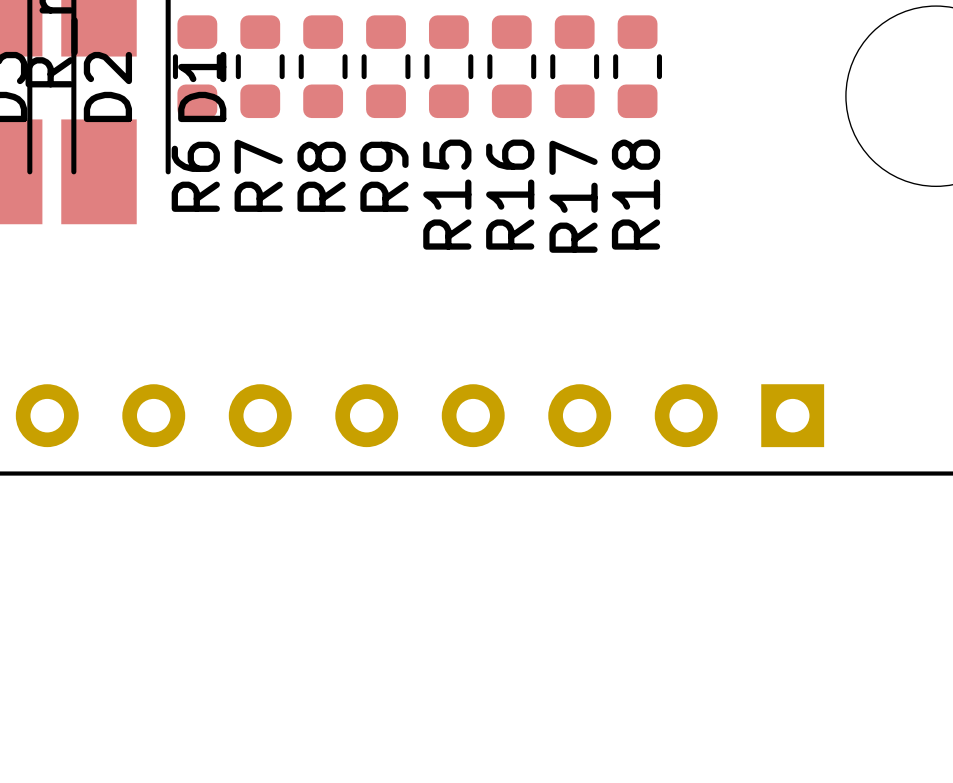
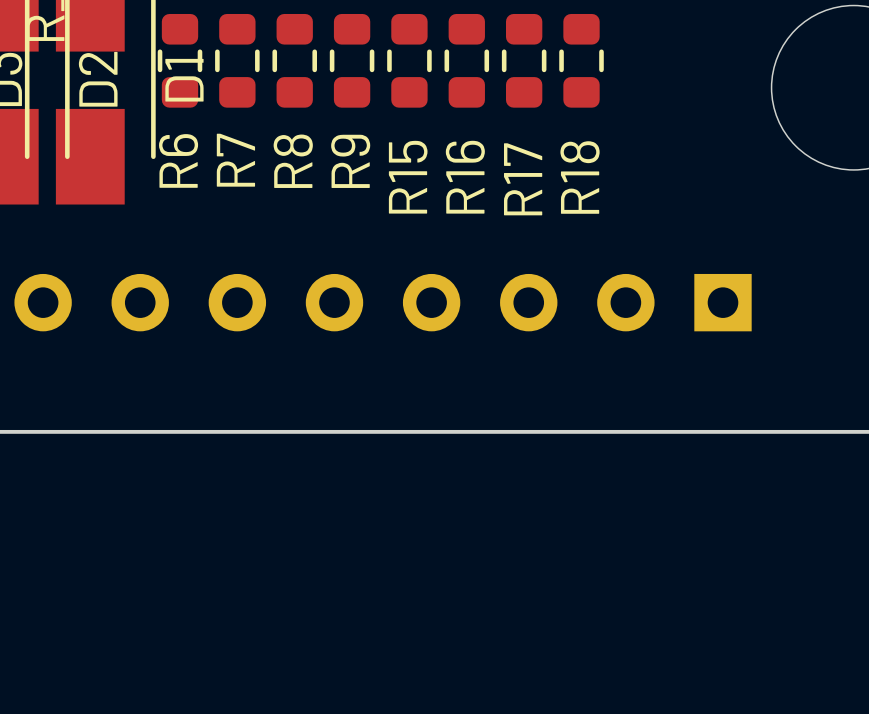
part position: (419, 415) -> (383, 302)

